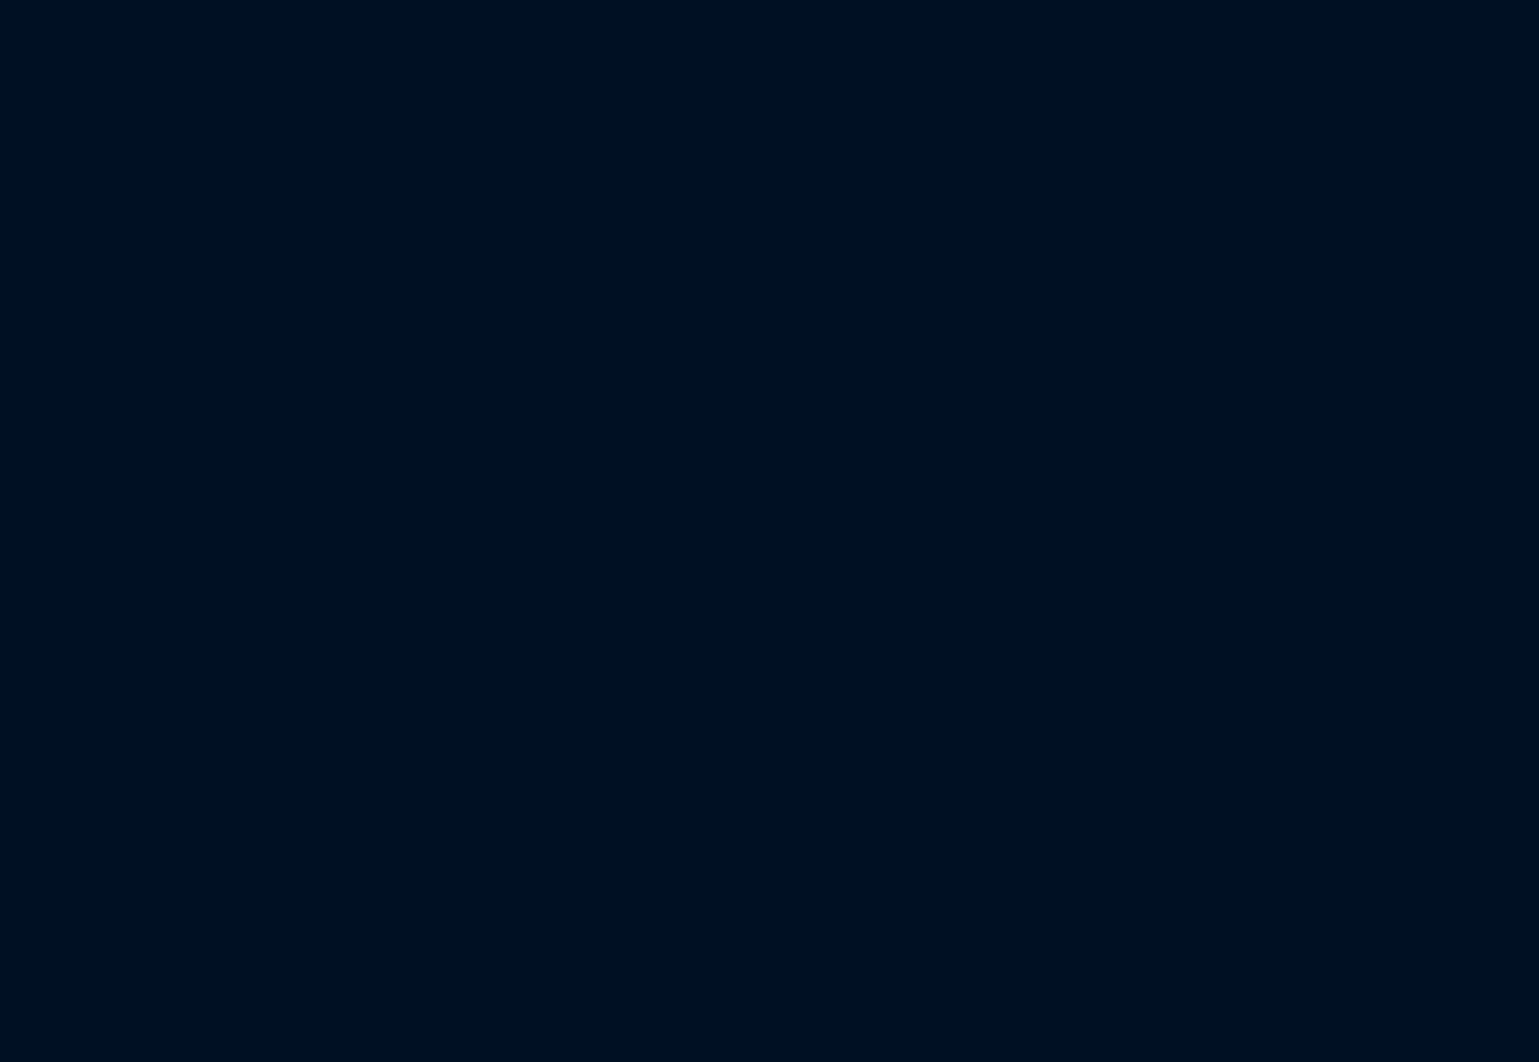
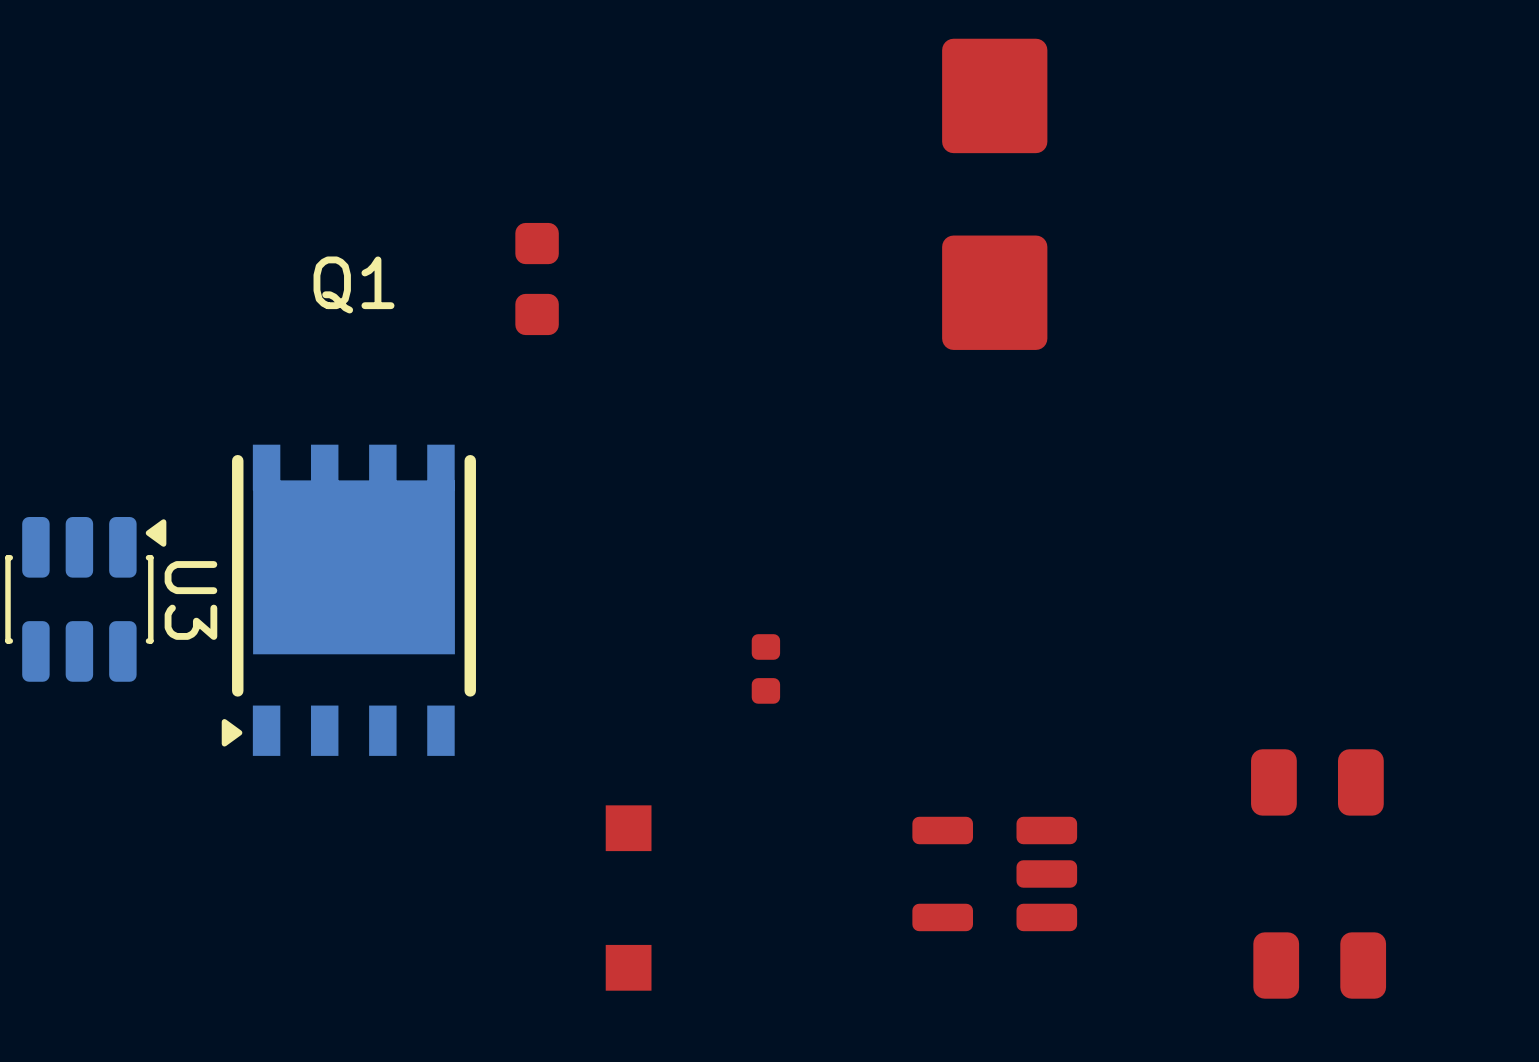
part: none -> (994, 194)
part: none -> (537, 279)
U3: none -> (85, 599)
Q1: none -> (348, 600)
part: none -> (765, 668)
part: none -> (1317, 782)
part: none -> (628, 828)
part: none -> (994, 873)
part: none -> (1319, 965)
part: none -> (628, 967)

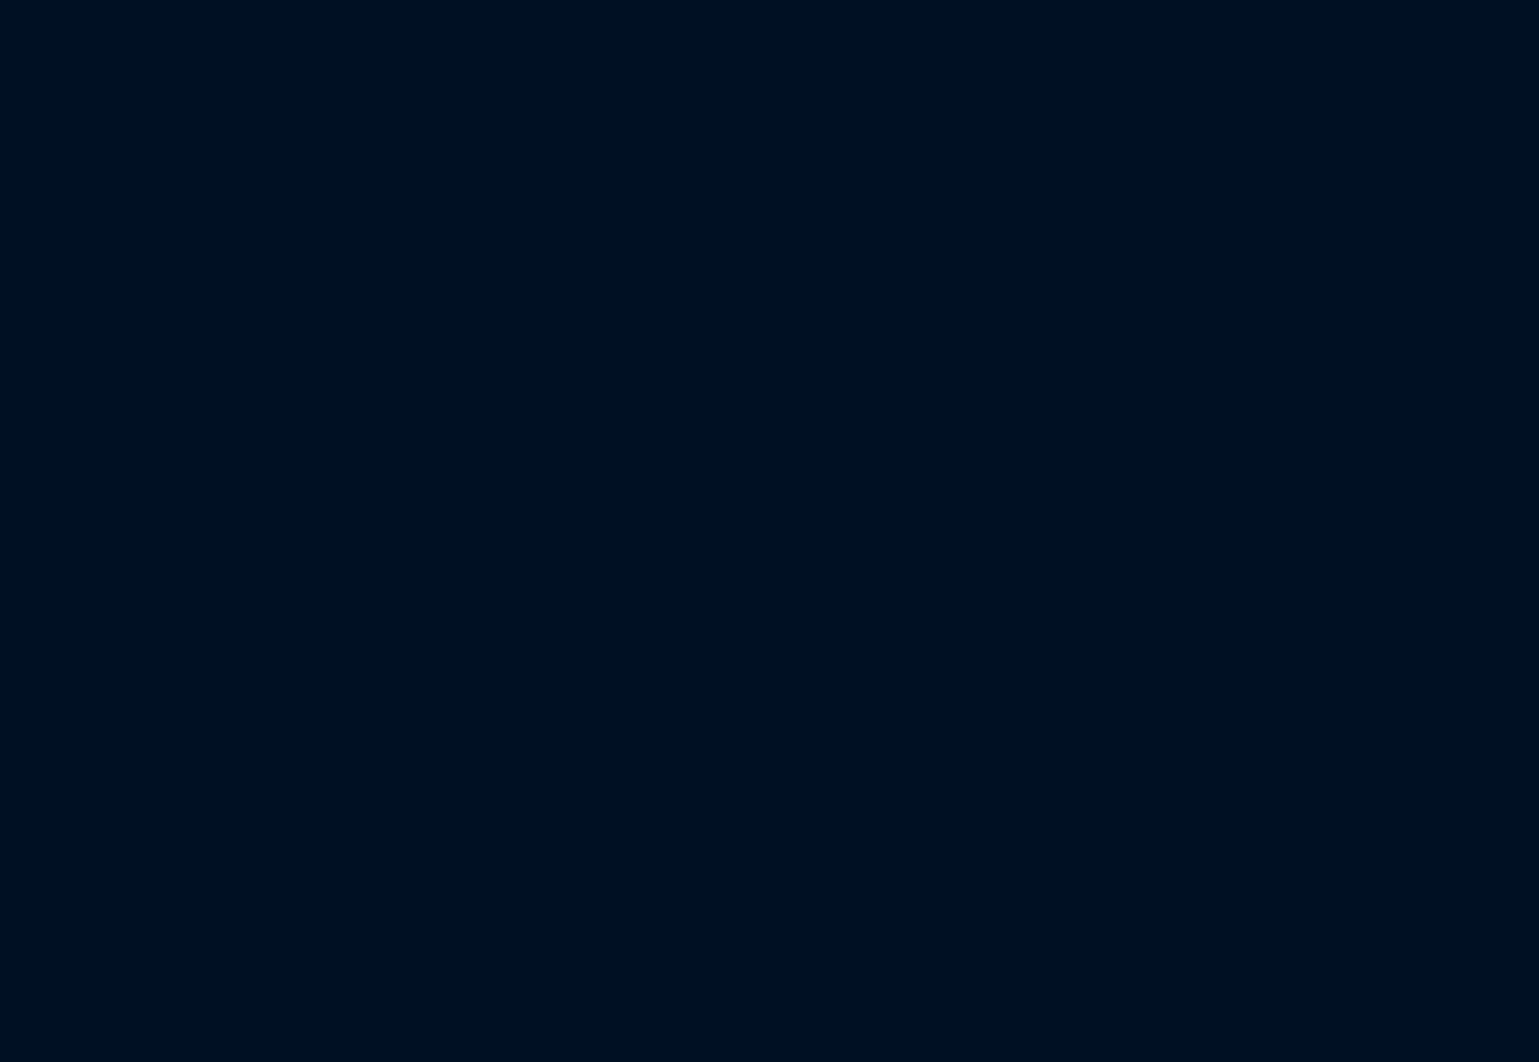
part: (994, 194) -> none
part: (537, 279) -> none
U3: (85, 599) -> none
Q1: (348, 600) -> none
part: (765, 668) -> none
part: (1317, 782) -> none
part: (628, 828) -> none
part: (994, 873) -> none
part: (1319, 965) -> none
part: (628, 967) -> none

